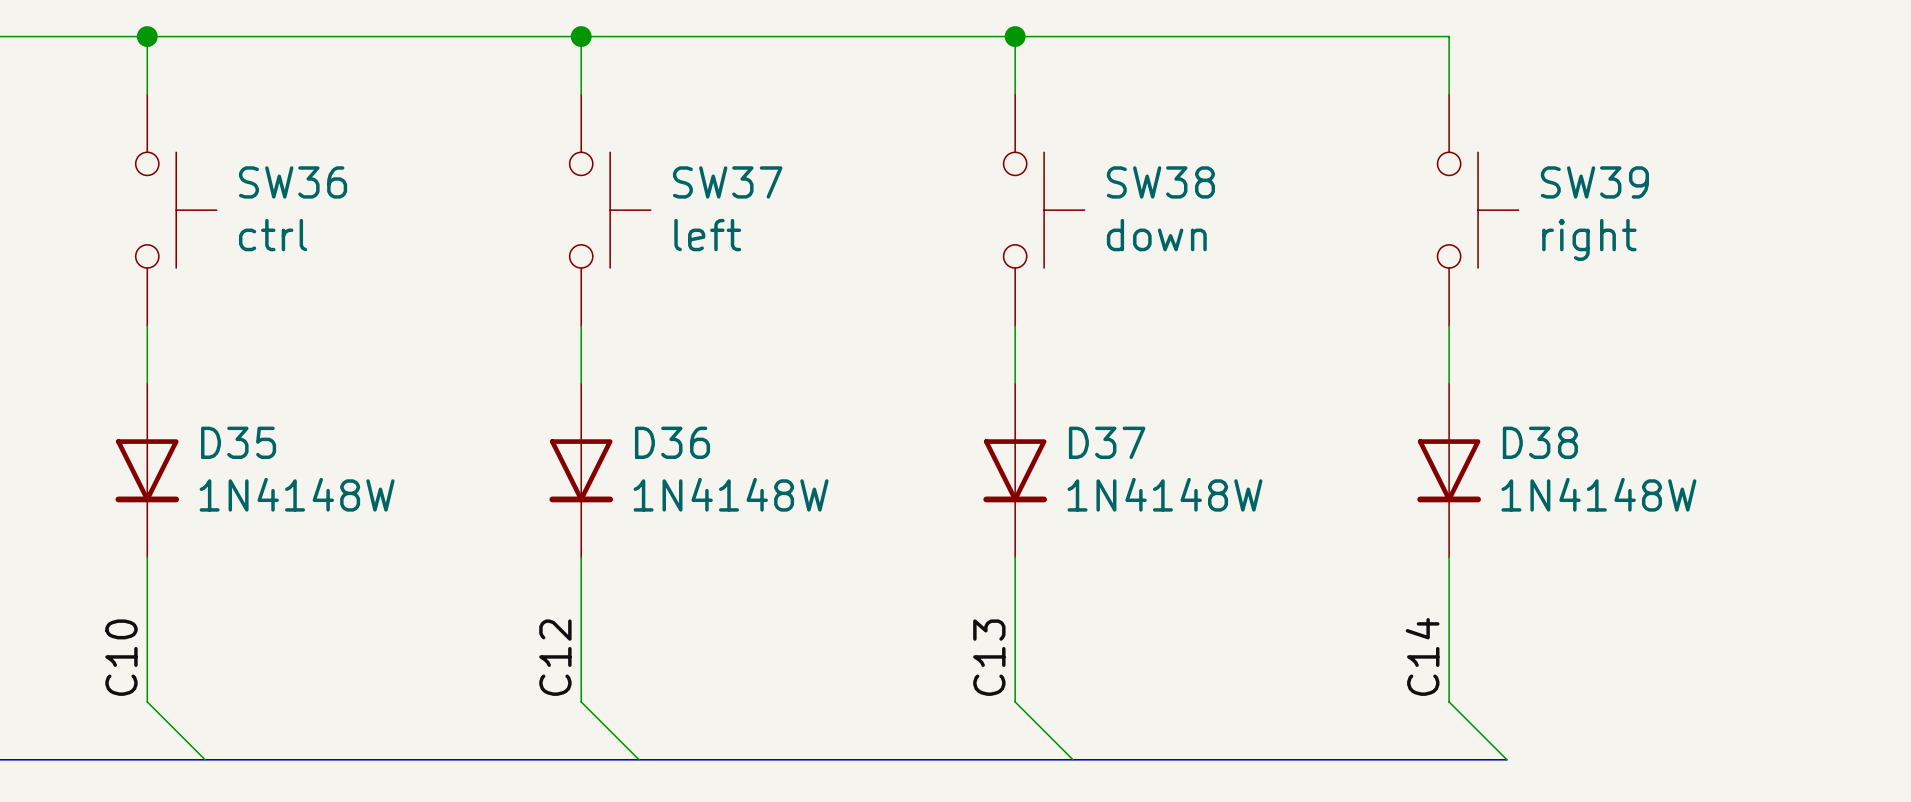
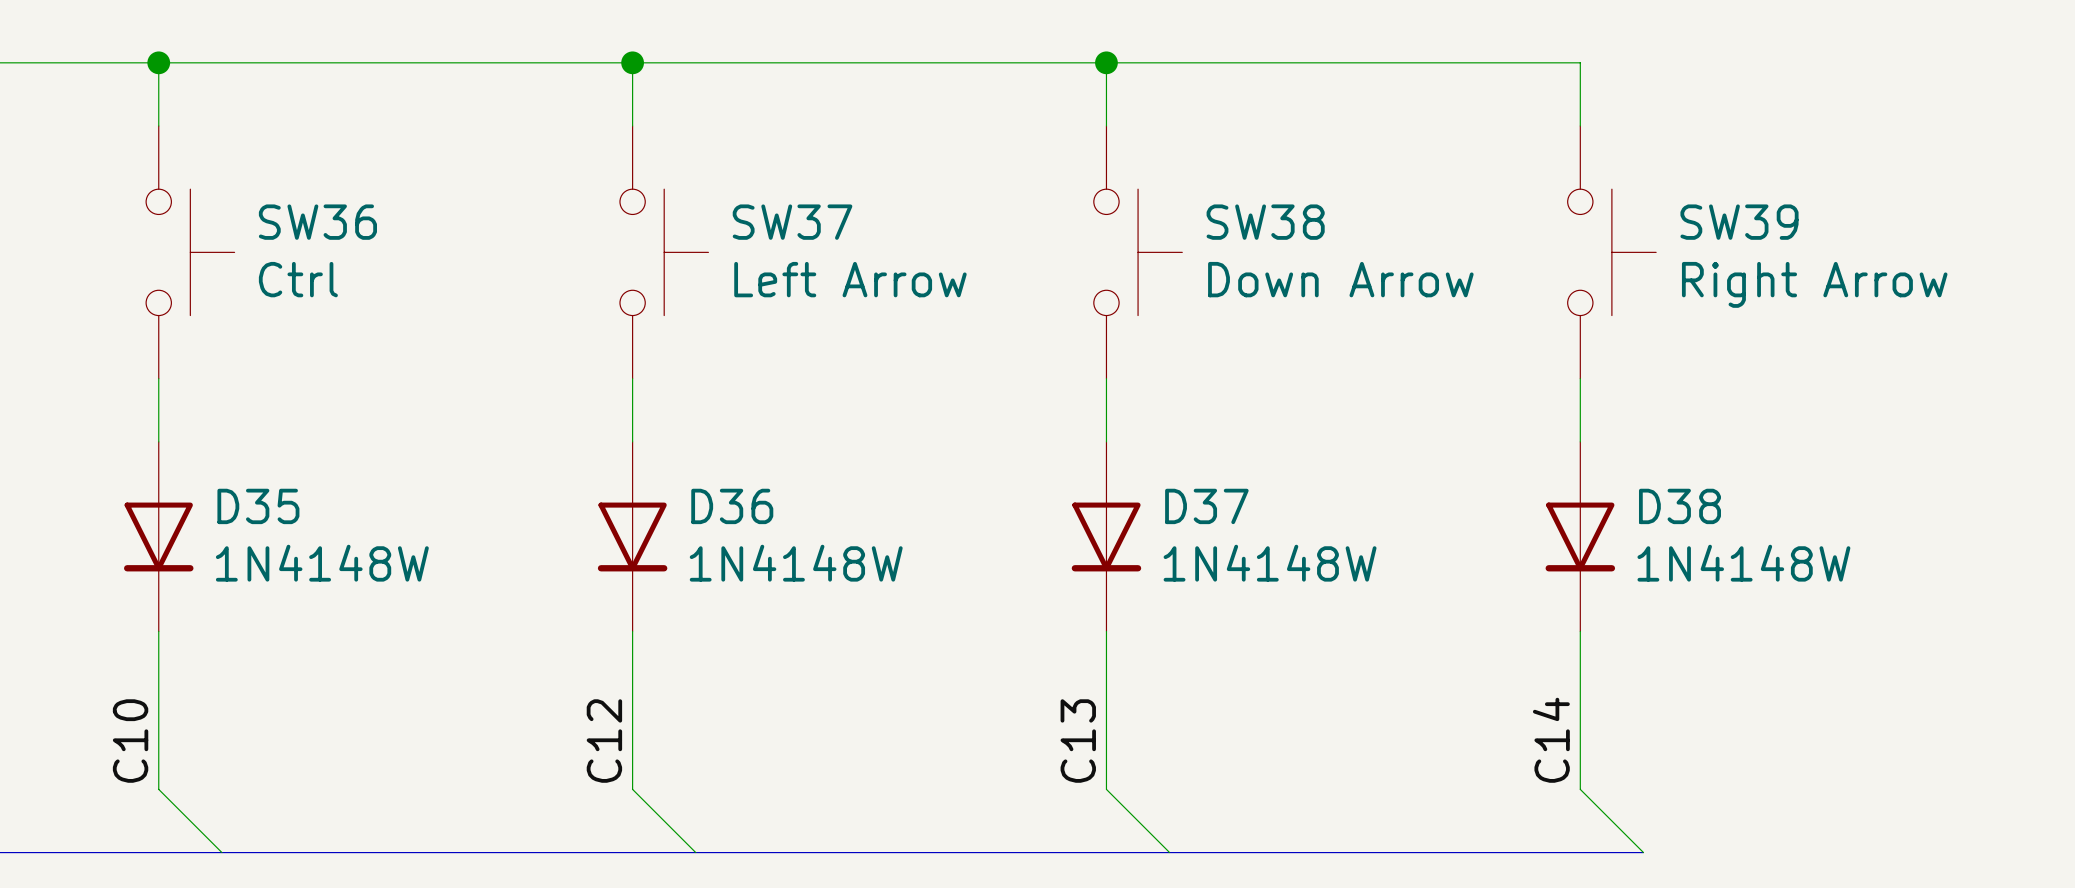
SW36 value: ctrl (273, 235) -> Ctrl (298, 279)
SW37 value: left (707, 235) -> Left Arrow (850, 279)
SW38 value: down (1156, 235) -> Down Arrow (1340, 279)
SW39 value: right (1589, 239) -> Right Arrow (1814, 284)

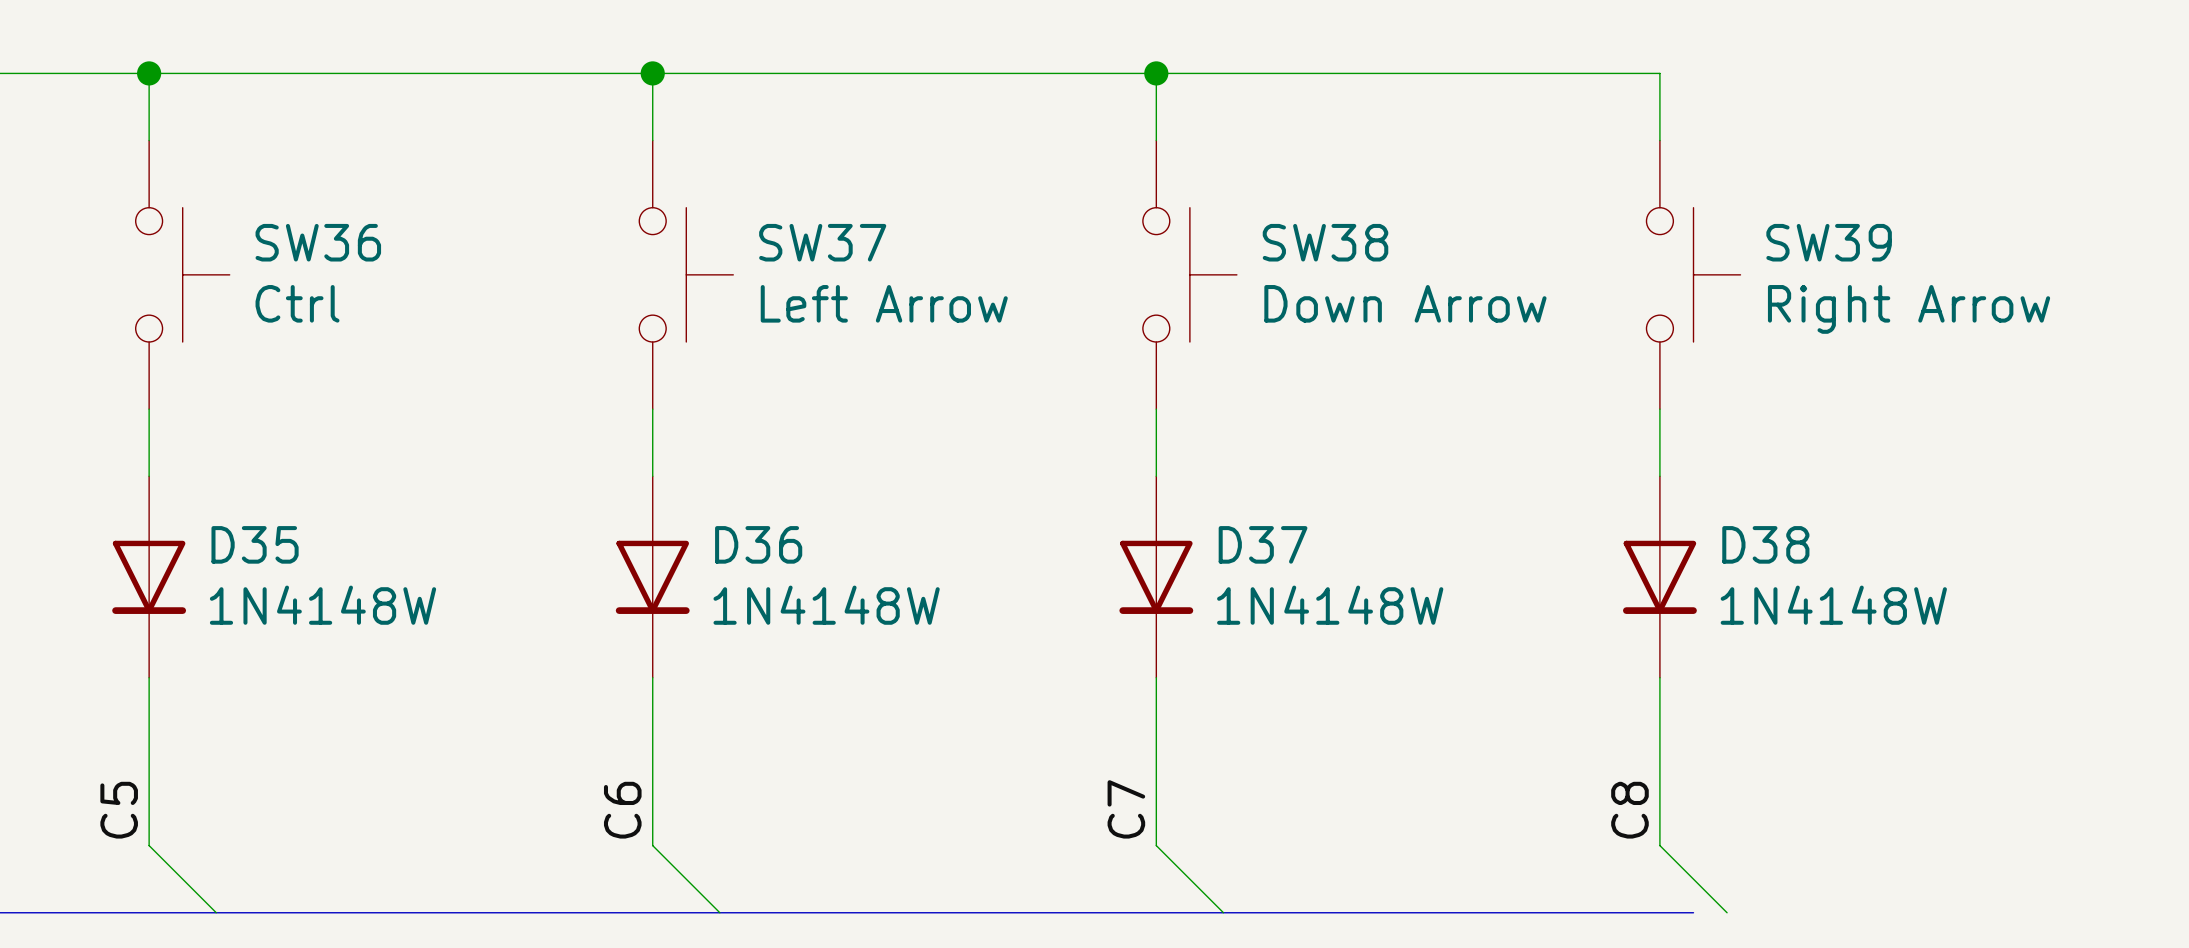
label: C14 (1551, 740) -> C8 (1629, 810)
label: C10 (130, 741) -> C5 (119, 810)
label: C12 (604, 741) -> C6 (622, 810)
label: C13 (1078, 741) -> C7 (1126, 809)
bus: (1611, 852) (1643, 852) -> none

